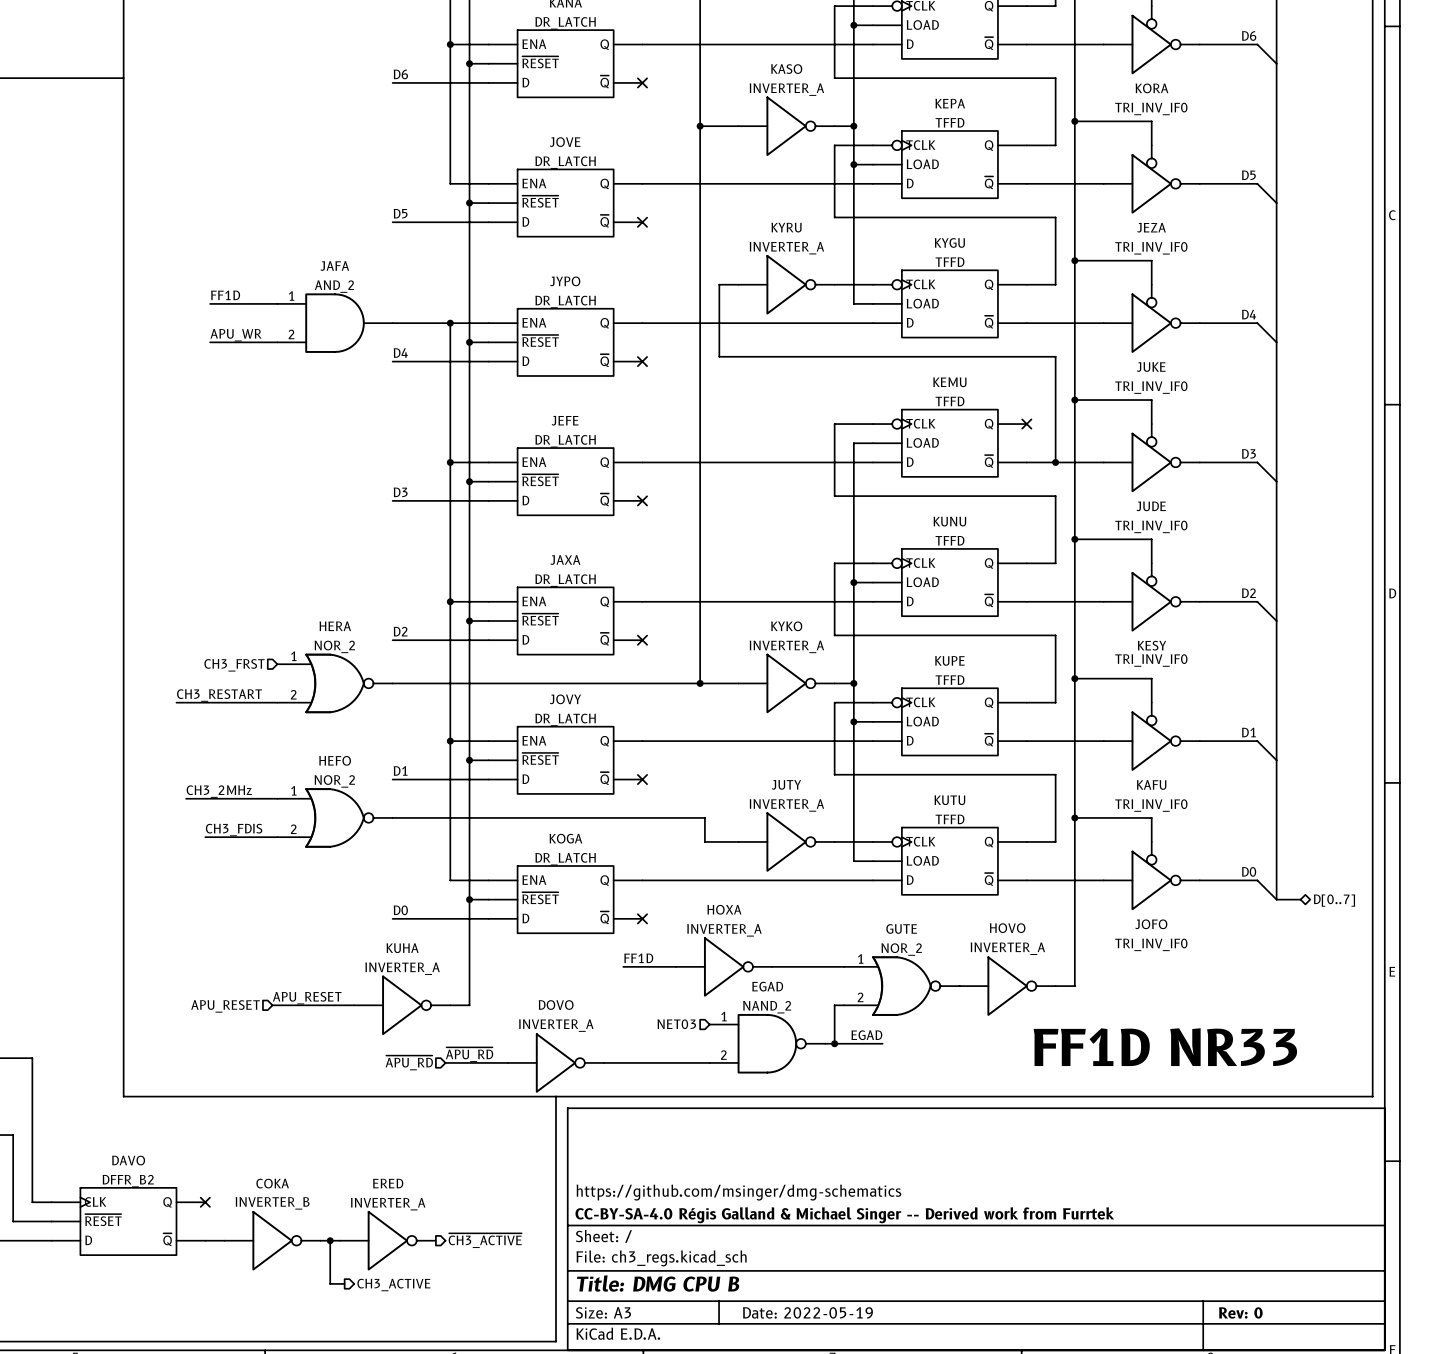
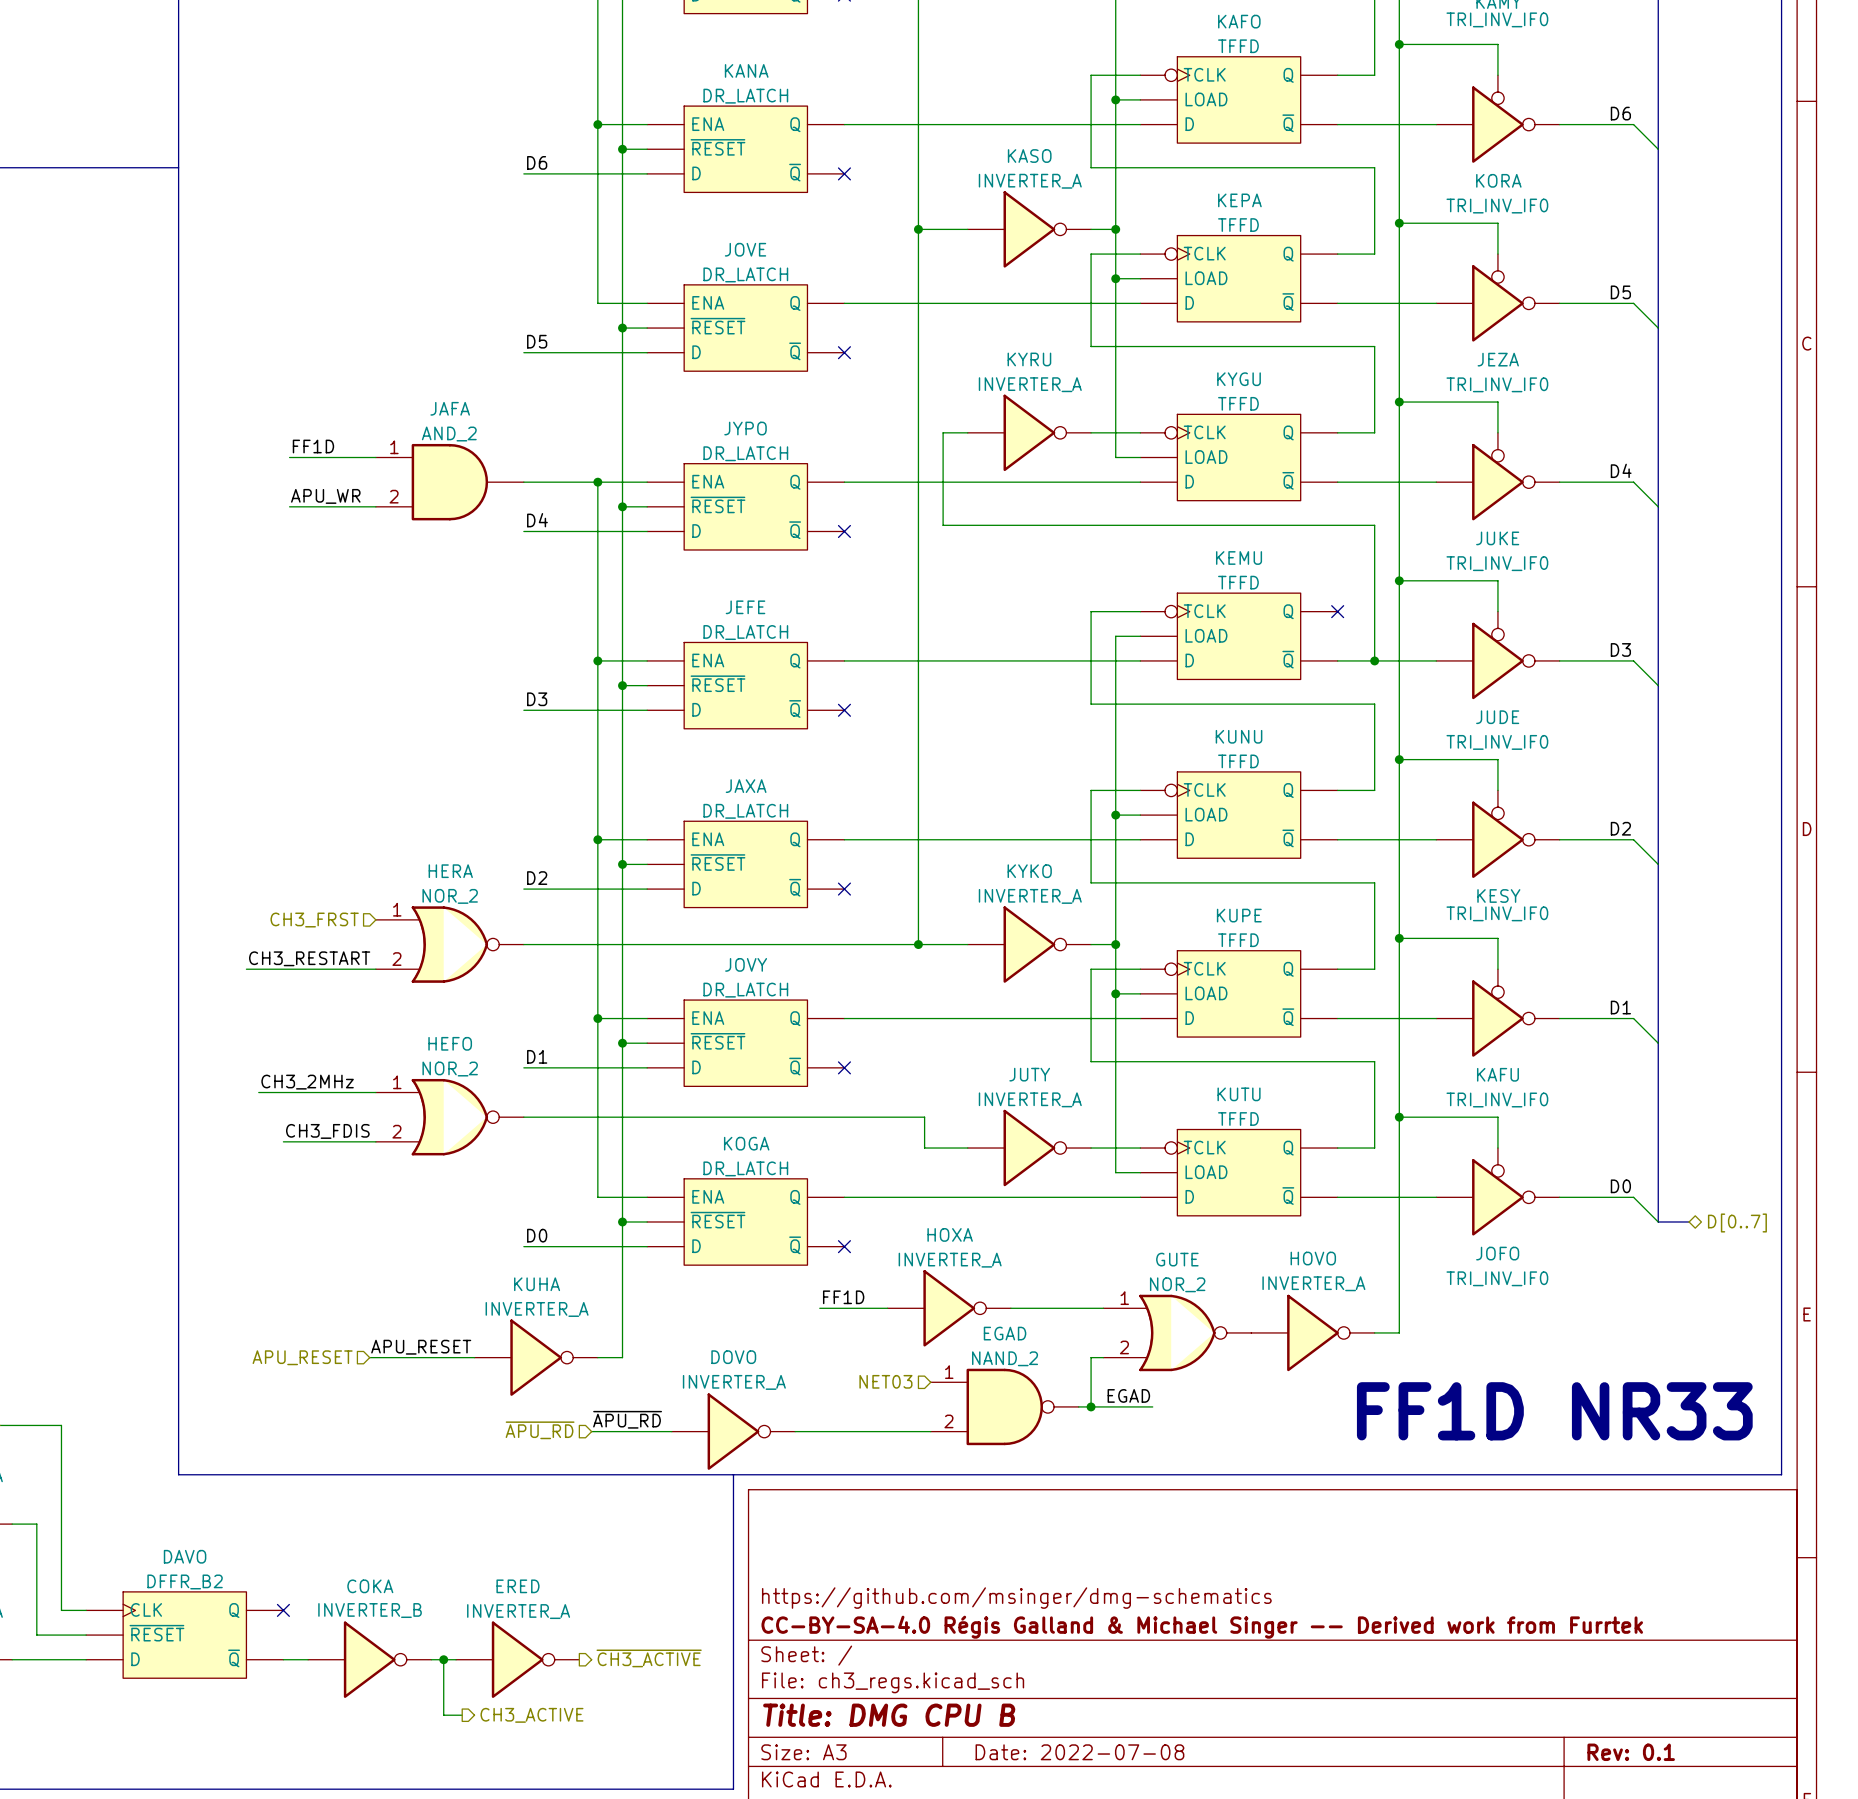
title block: Date: 2022-05-19 (807, 1312) -> Date: 2022-07-08 (1079, 1752)
title block: Rev: 0 (1240, 1312) -> Rev: 0.1 (1631, 1752)

